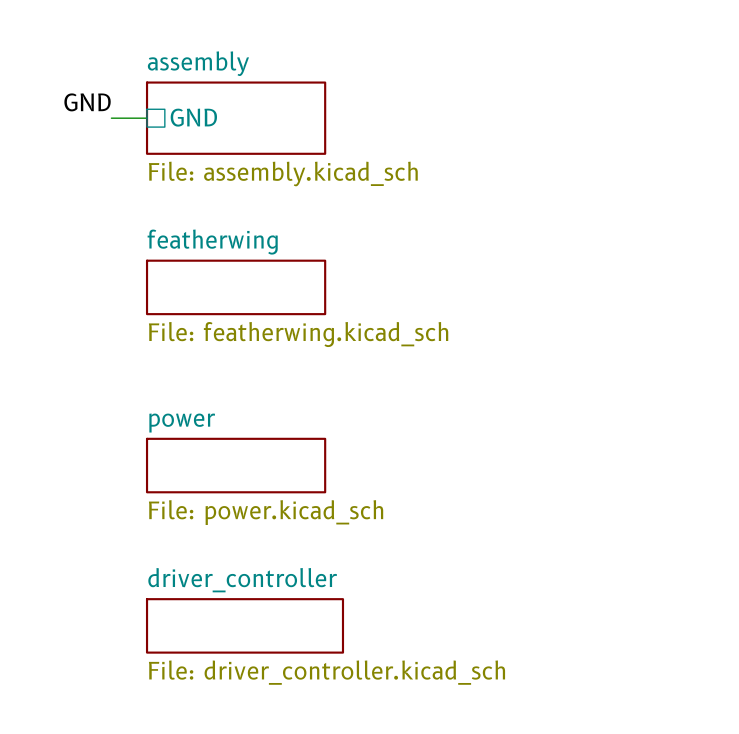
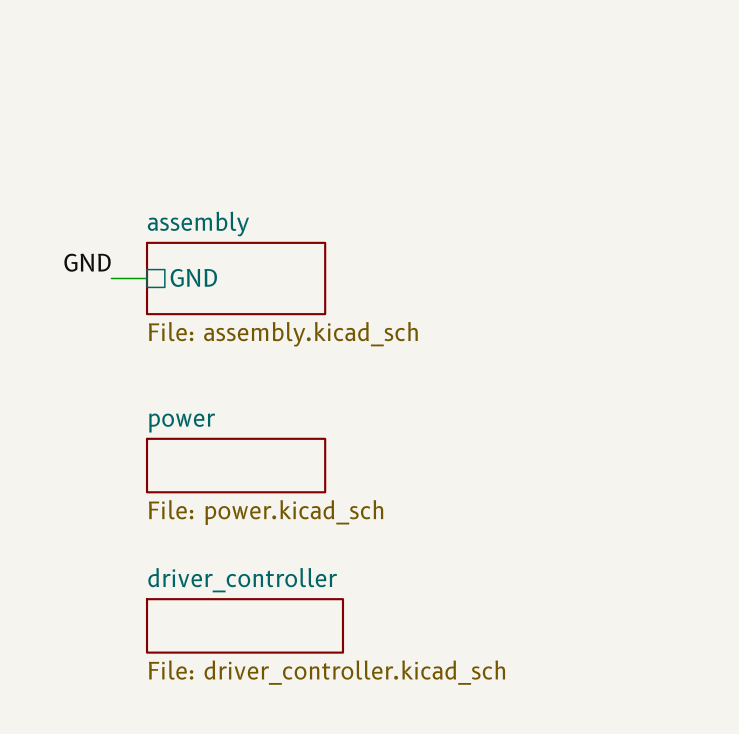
label position: GND (87, 102) -> GND (87, 262)
sheet pin position: GND (193, 117) -> GND (193, 277)
wire: (111, 118) (147, 118) -> (111, 278) (147, 278)
sheet assembly position: (236, 118) -> (236, 278)
sheet featherwing: File: featherwing.kicad_sch (236, 287) -> none

